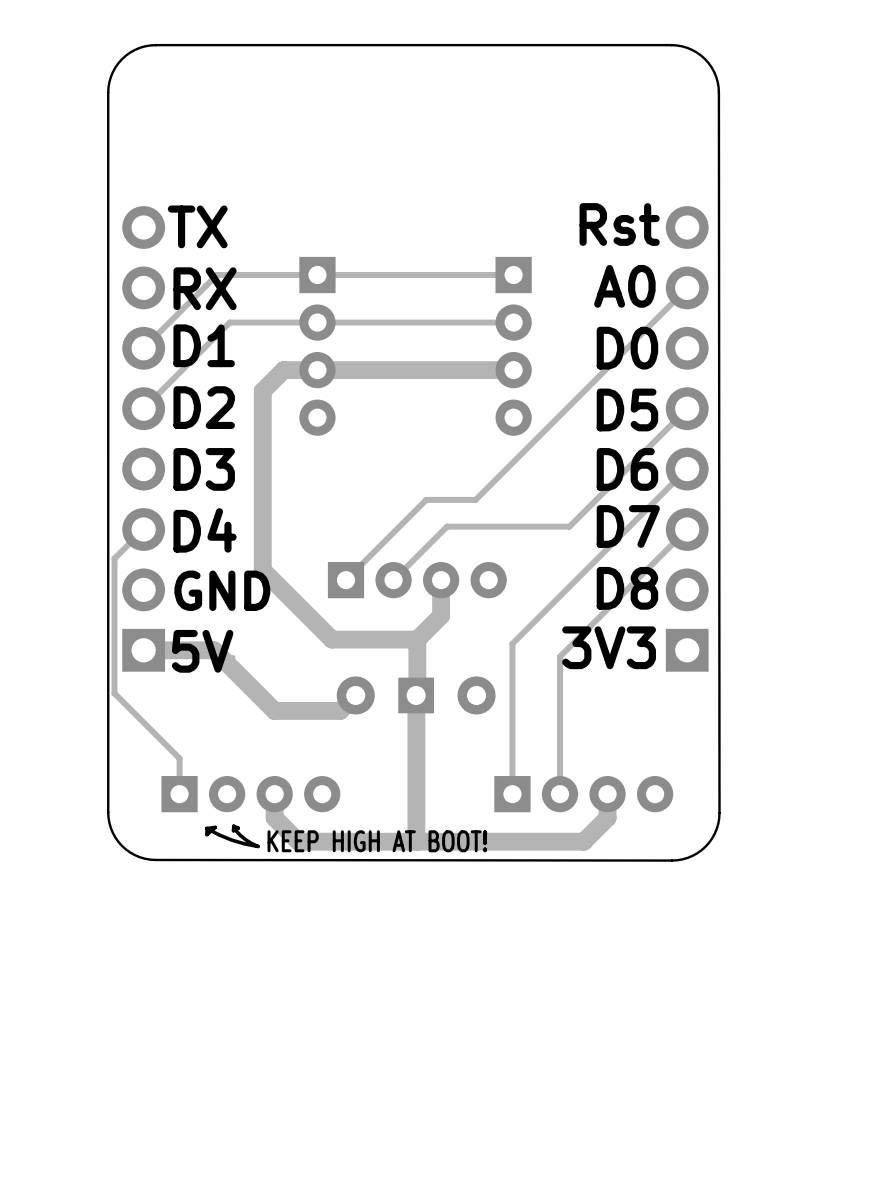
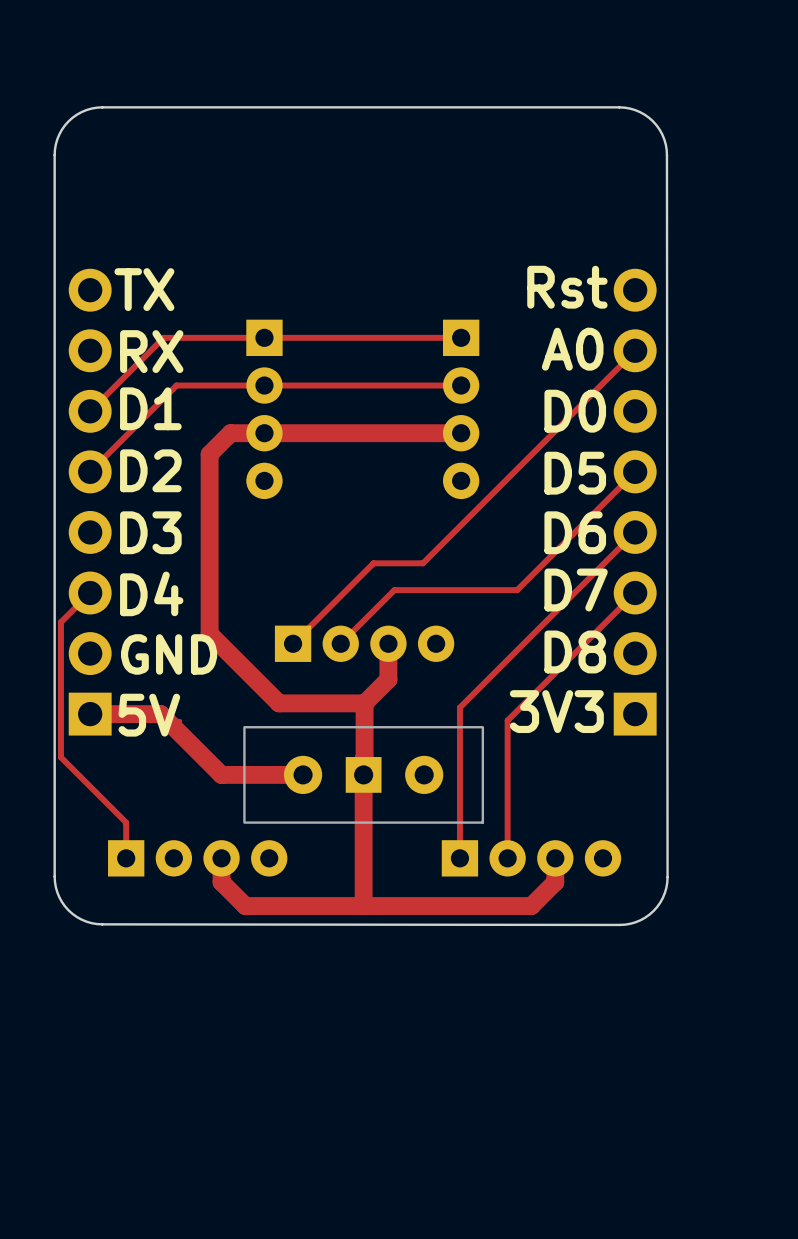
part side: bottom (416, 695) -> top (363, 774)
line: (233, 826) (238, 828) (233, 830) (233, 826) -> none
line: (207, 828) (215, 827) (207, 834) (207, 828) -> none
line: (207, 828) (231, 840) (258, 846) (245, 840) (235, 830) -> none
text: KEEP HIGH AT BOOT! (377, 841) -> none

